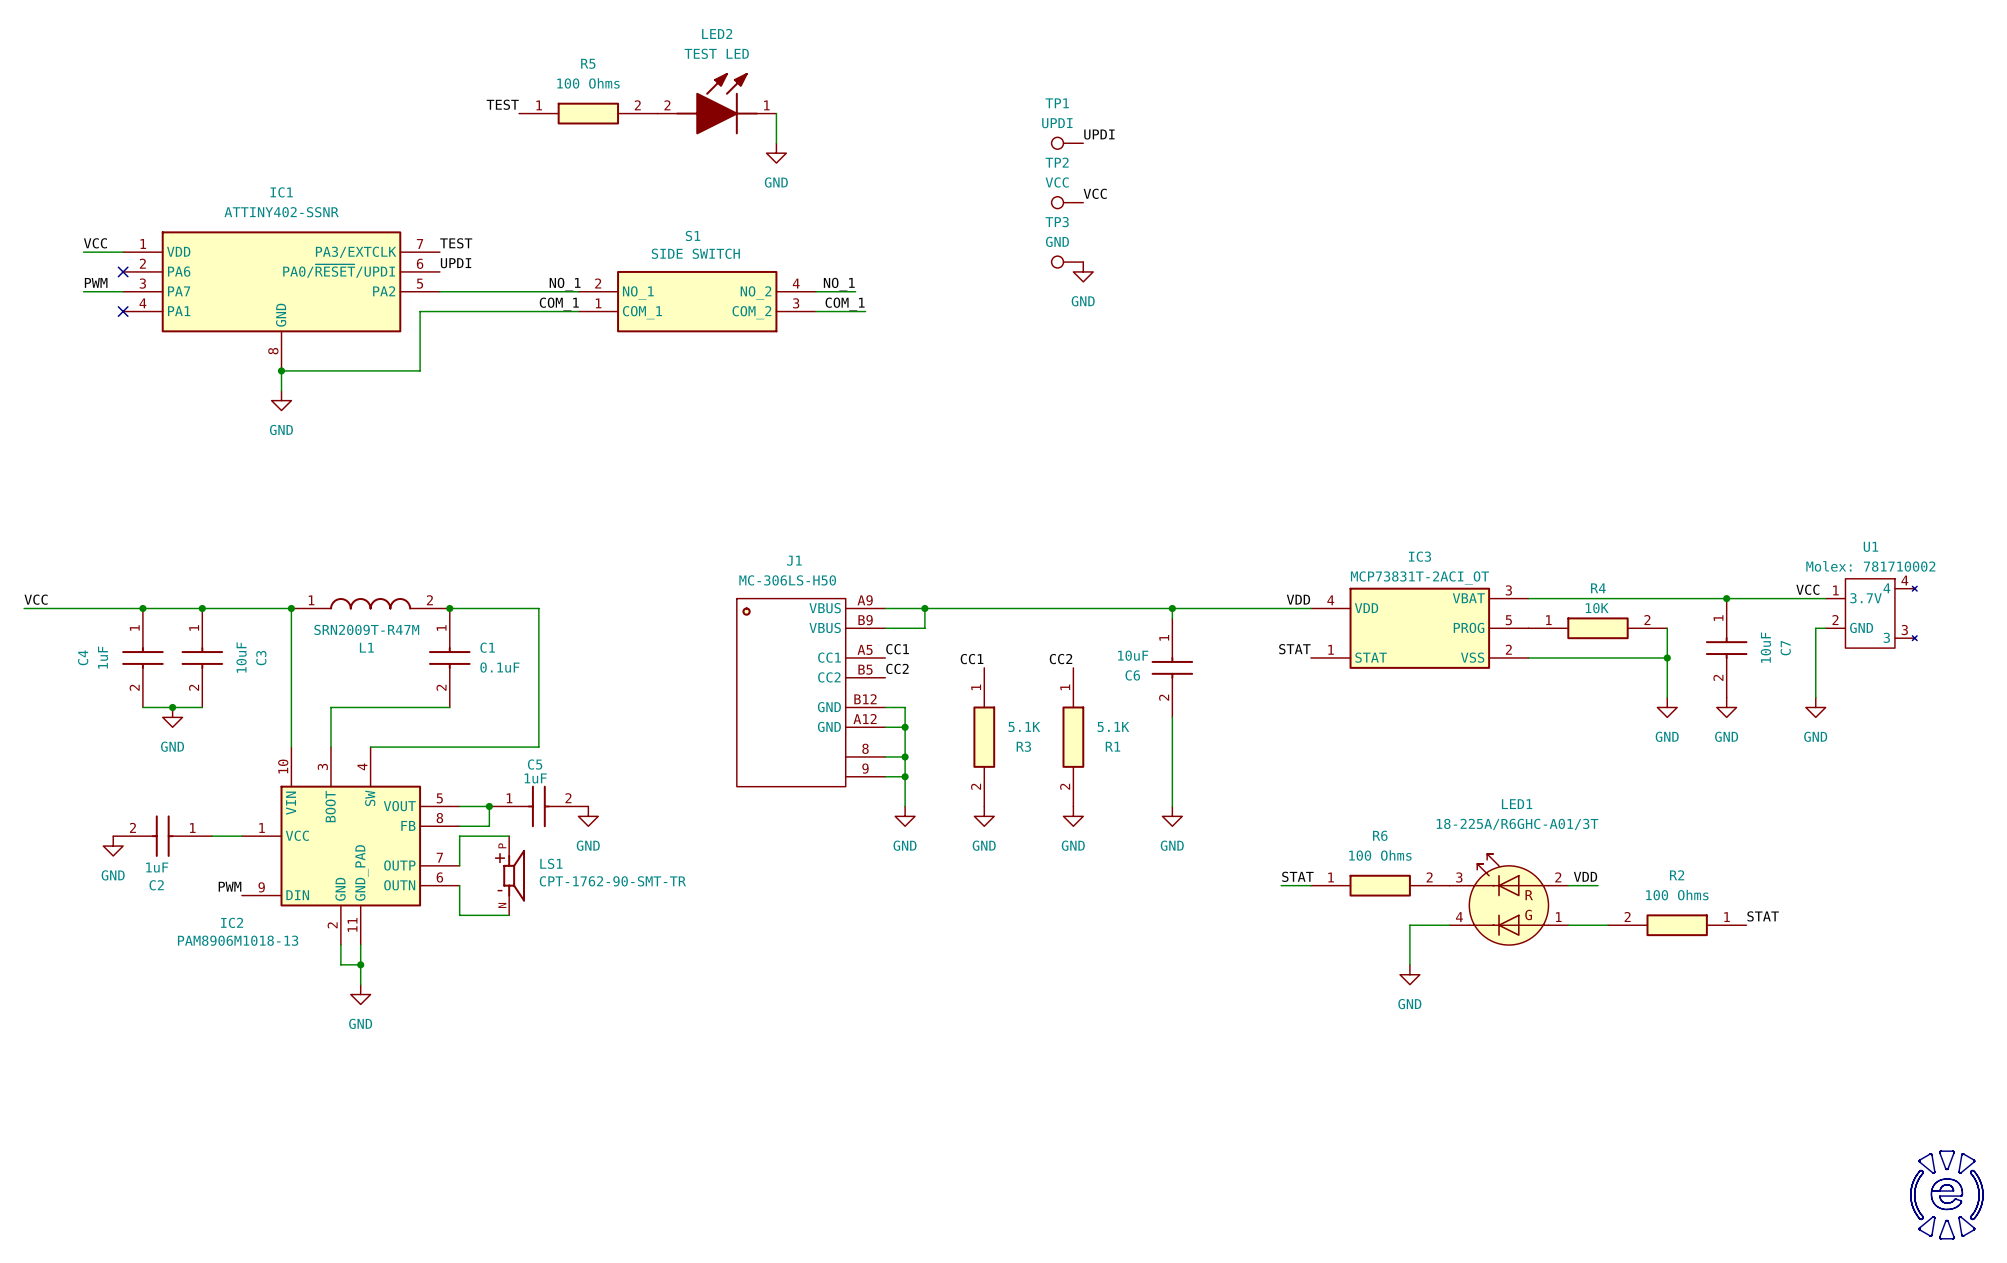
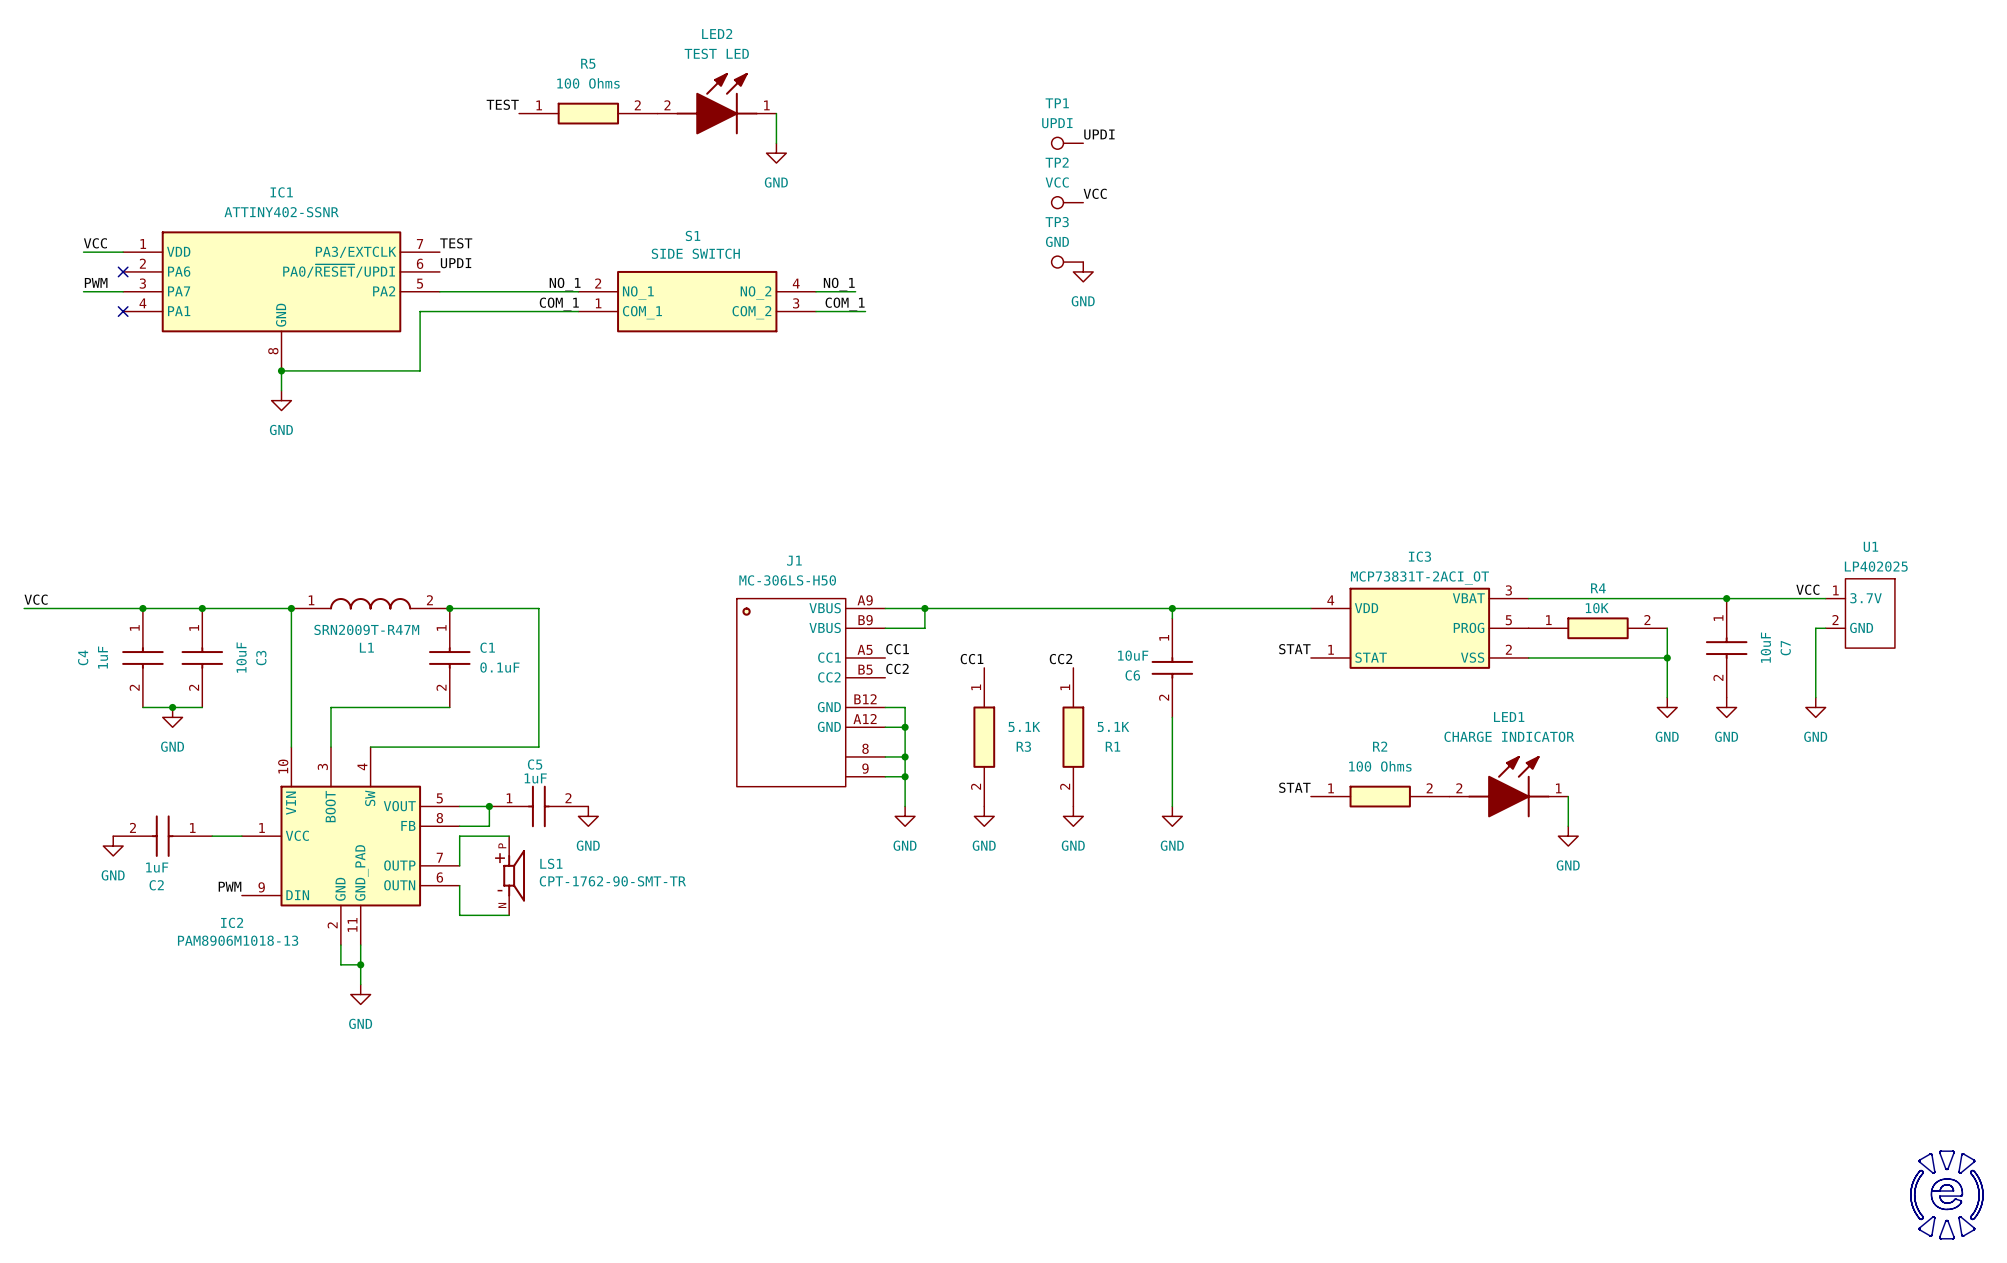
U1 value: Molex: 781710002 (1870, 566) -> LP402025 (1876, 566)
U1 symbol: [1825, 578, 1918, 649] -> [1825, 578, 1895, 649]
label: VDD (1298, 599) -> none
wire: none -> (1568, 796) (1568, 826)
LED1 name position: LED1 (1517, 804) -> LED1 (1509, 717)
LED1 value: 18-225A/R6GHC-A01/3T (1517, 824) -> CHARGE INDICATOR (1509, 736)
power symbol: none -> GND (1568, 836)
LED1 symbol: [1449, 853, 1569, 946] -> [1449, 755, 1569, 818]
label position: STAT (1297, 876) -> STAT (1294, 787)
label: VDD (1585, 876) -> none
wire: (1281, 885) (1310, 885) -> none
R6: 100 Ohms (1380, 885) -> none
wire: (1568, 885) (1597, 885) -> none
label: STAT (1763, 916) -> none
wire: (1449, 925) (1409, 925) (1409, 964) -> none
wire: (1568, 925) (1607, 925) -> none
R2 rotation: 0° (1677, 925) -> 180° (1380, 796)
R2 position: (1677, 925) -> (1380, 796)
power symbol: GND (1409, 974) -> none

